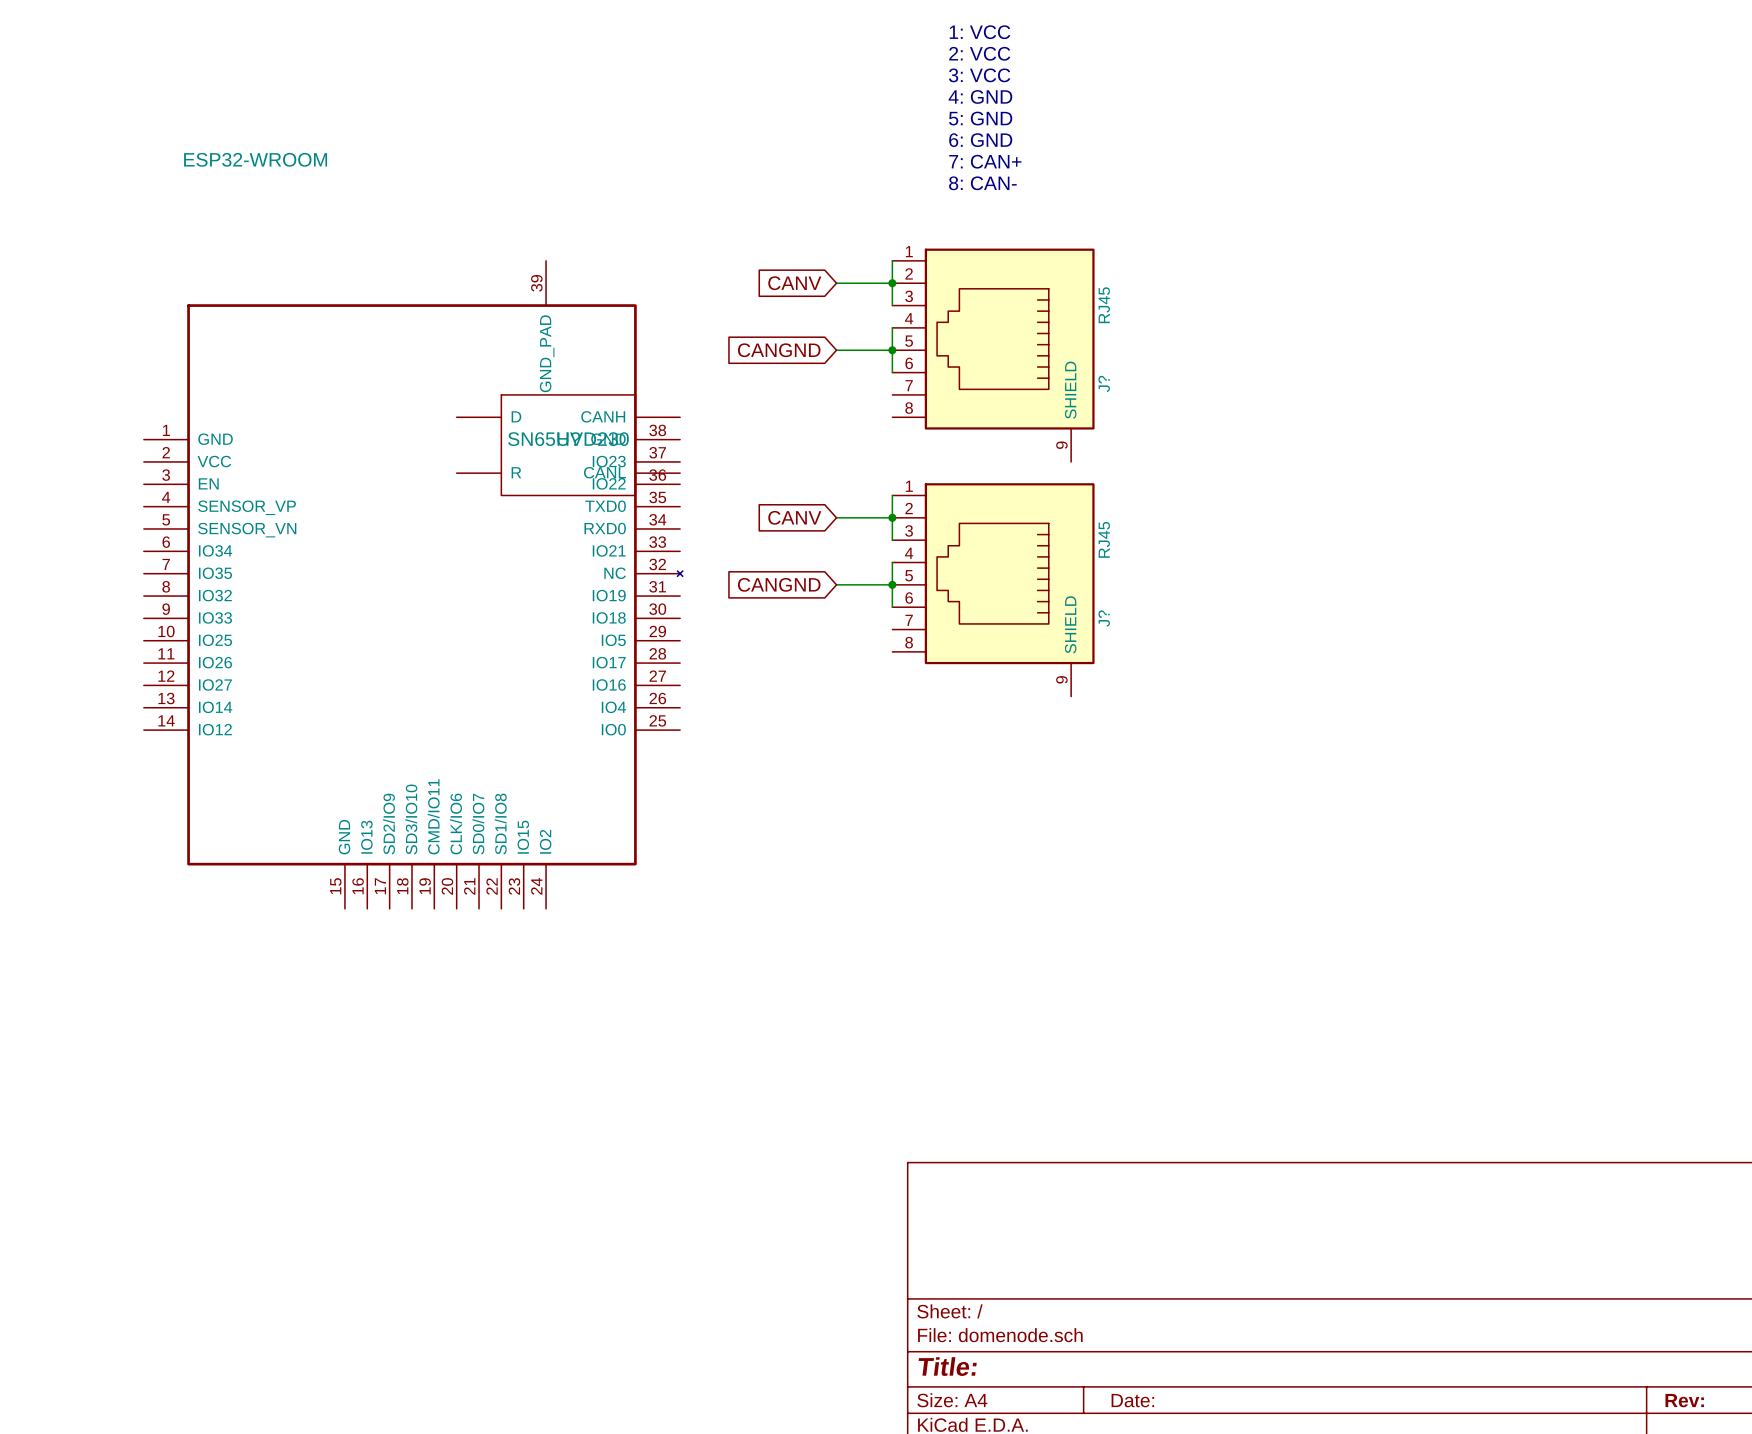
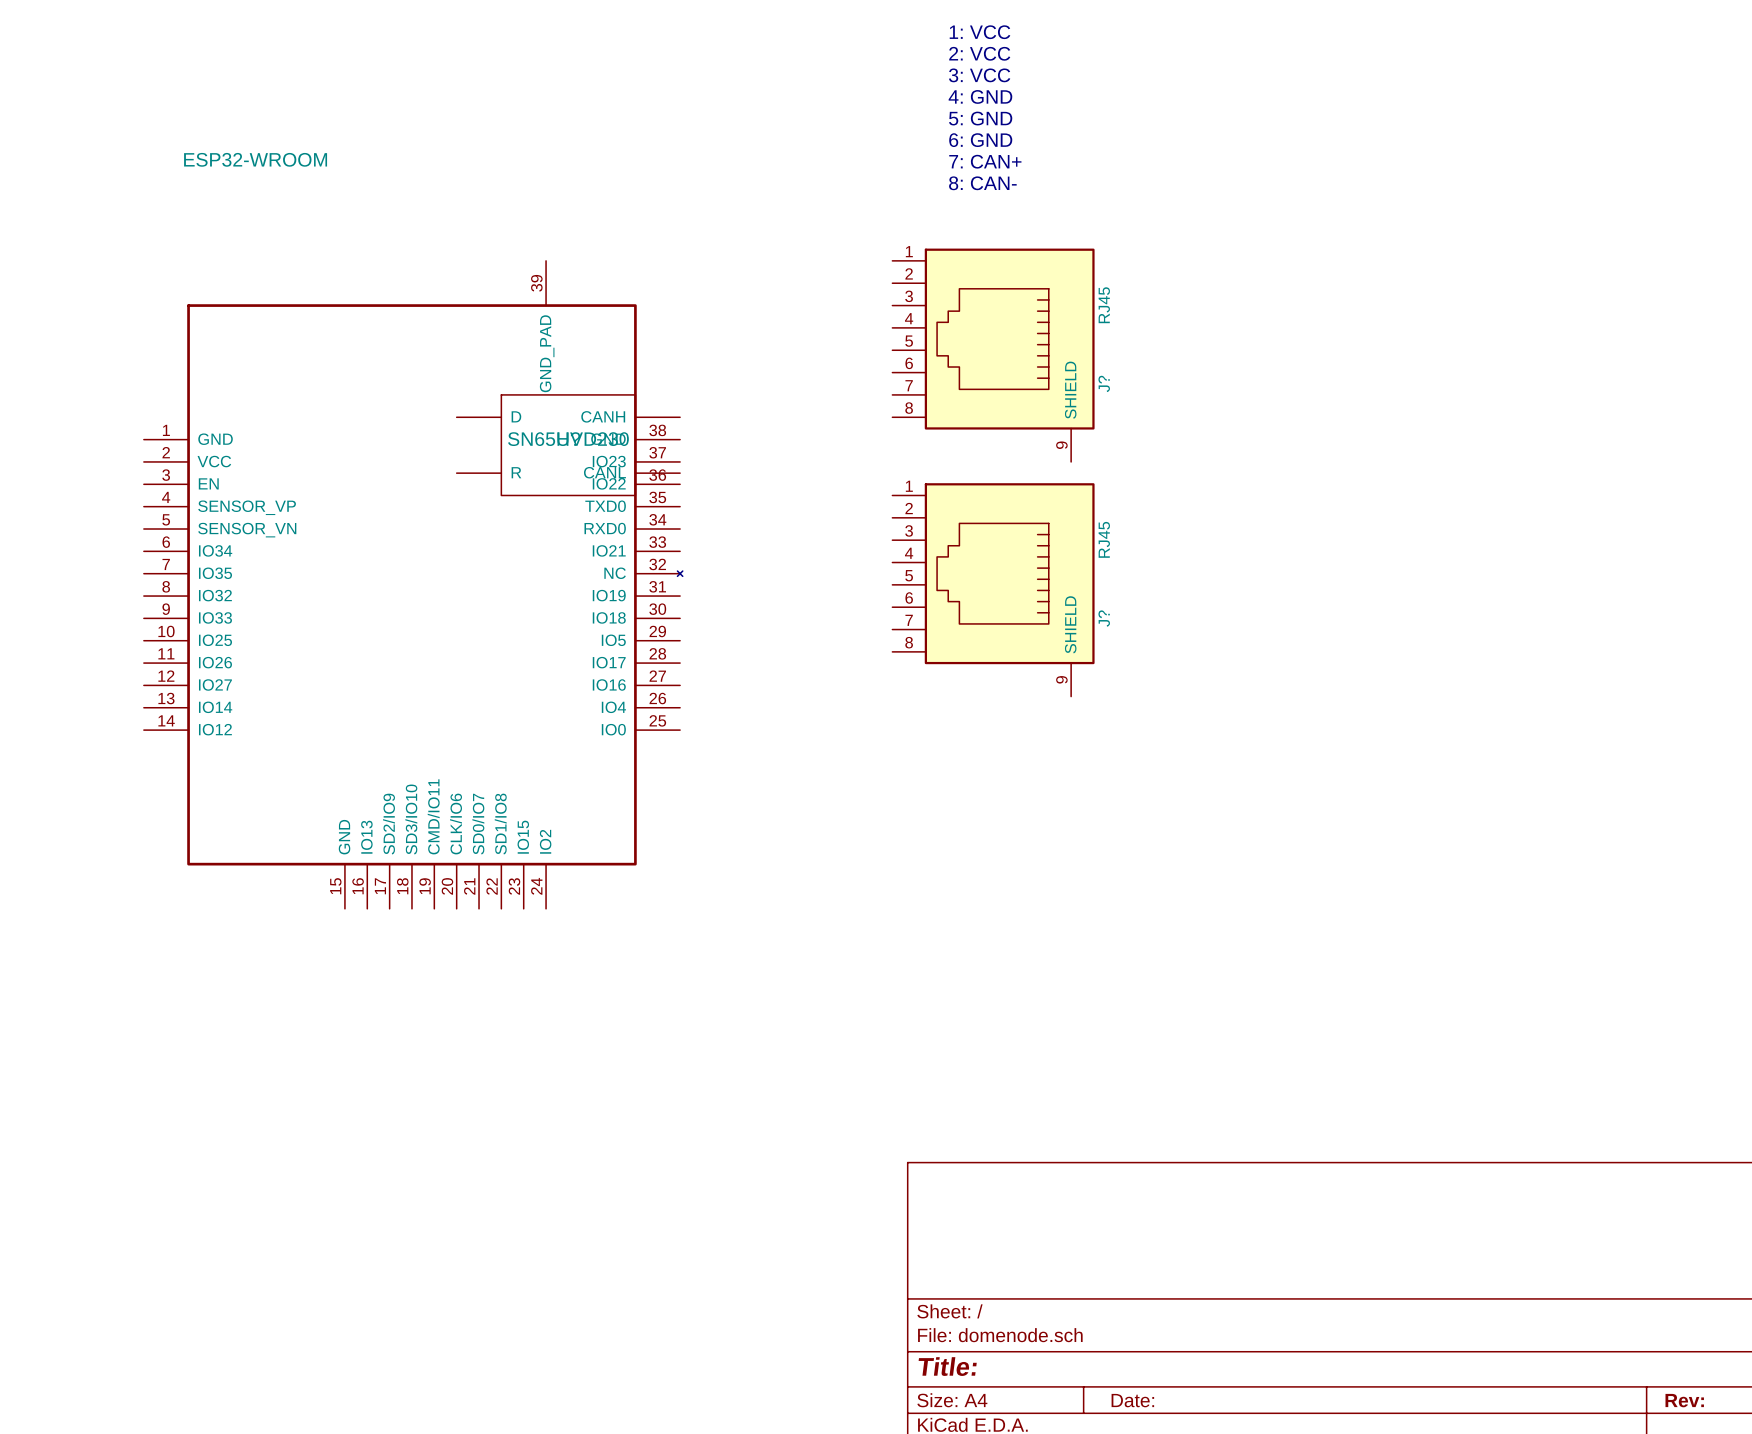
wire: (892, 260) (892, 305) -> none
global label: CANV (794, 283) -> none
wire: (836, 283) (892, 283) -> none
junction: (892, 283) -> none
wire: (892, 327) (892, 372) -> none
global label: CANGND (779, 350) -> none
wire: (836, 350) (892, 350) -> none
junction: (892, 350) -> none
wire: (892, 495) (892, 540) -> none
global label: CANV (794, 517) -> none
wire: (836, 517) (892, 517) -> none
junction: (892, 517) -> none
wire: (892, 562) (892, 607) -> none
global label: CANGND (779, 584) -> none
wire: (836, 584) (892, 584) -> none
junction: (892, 584) -> none

